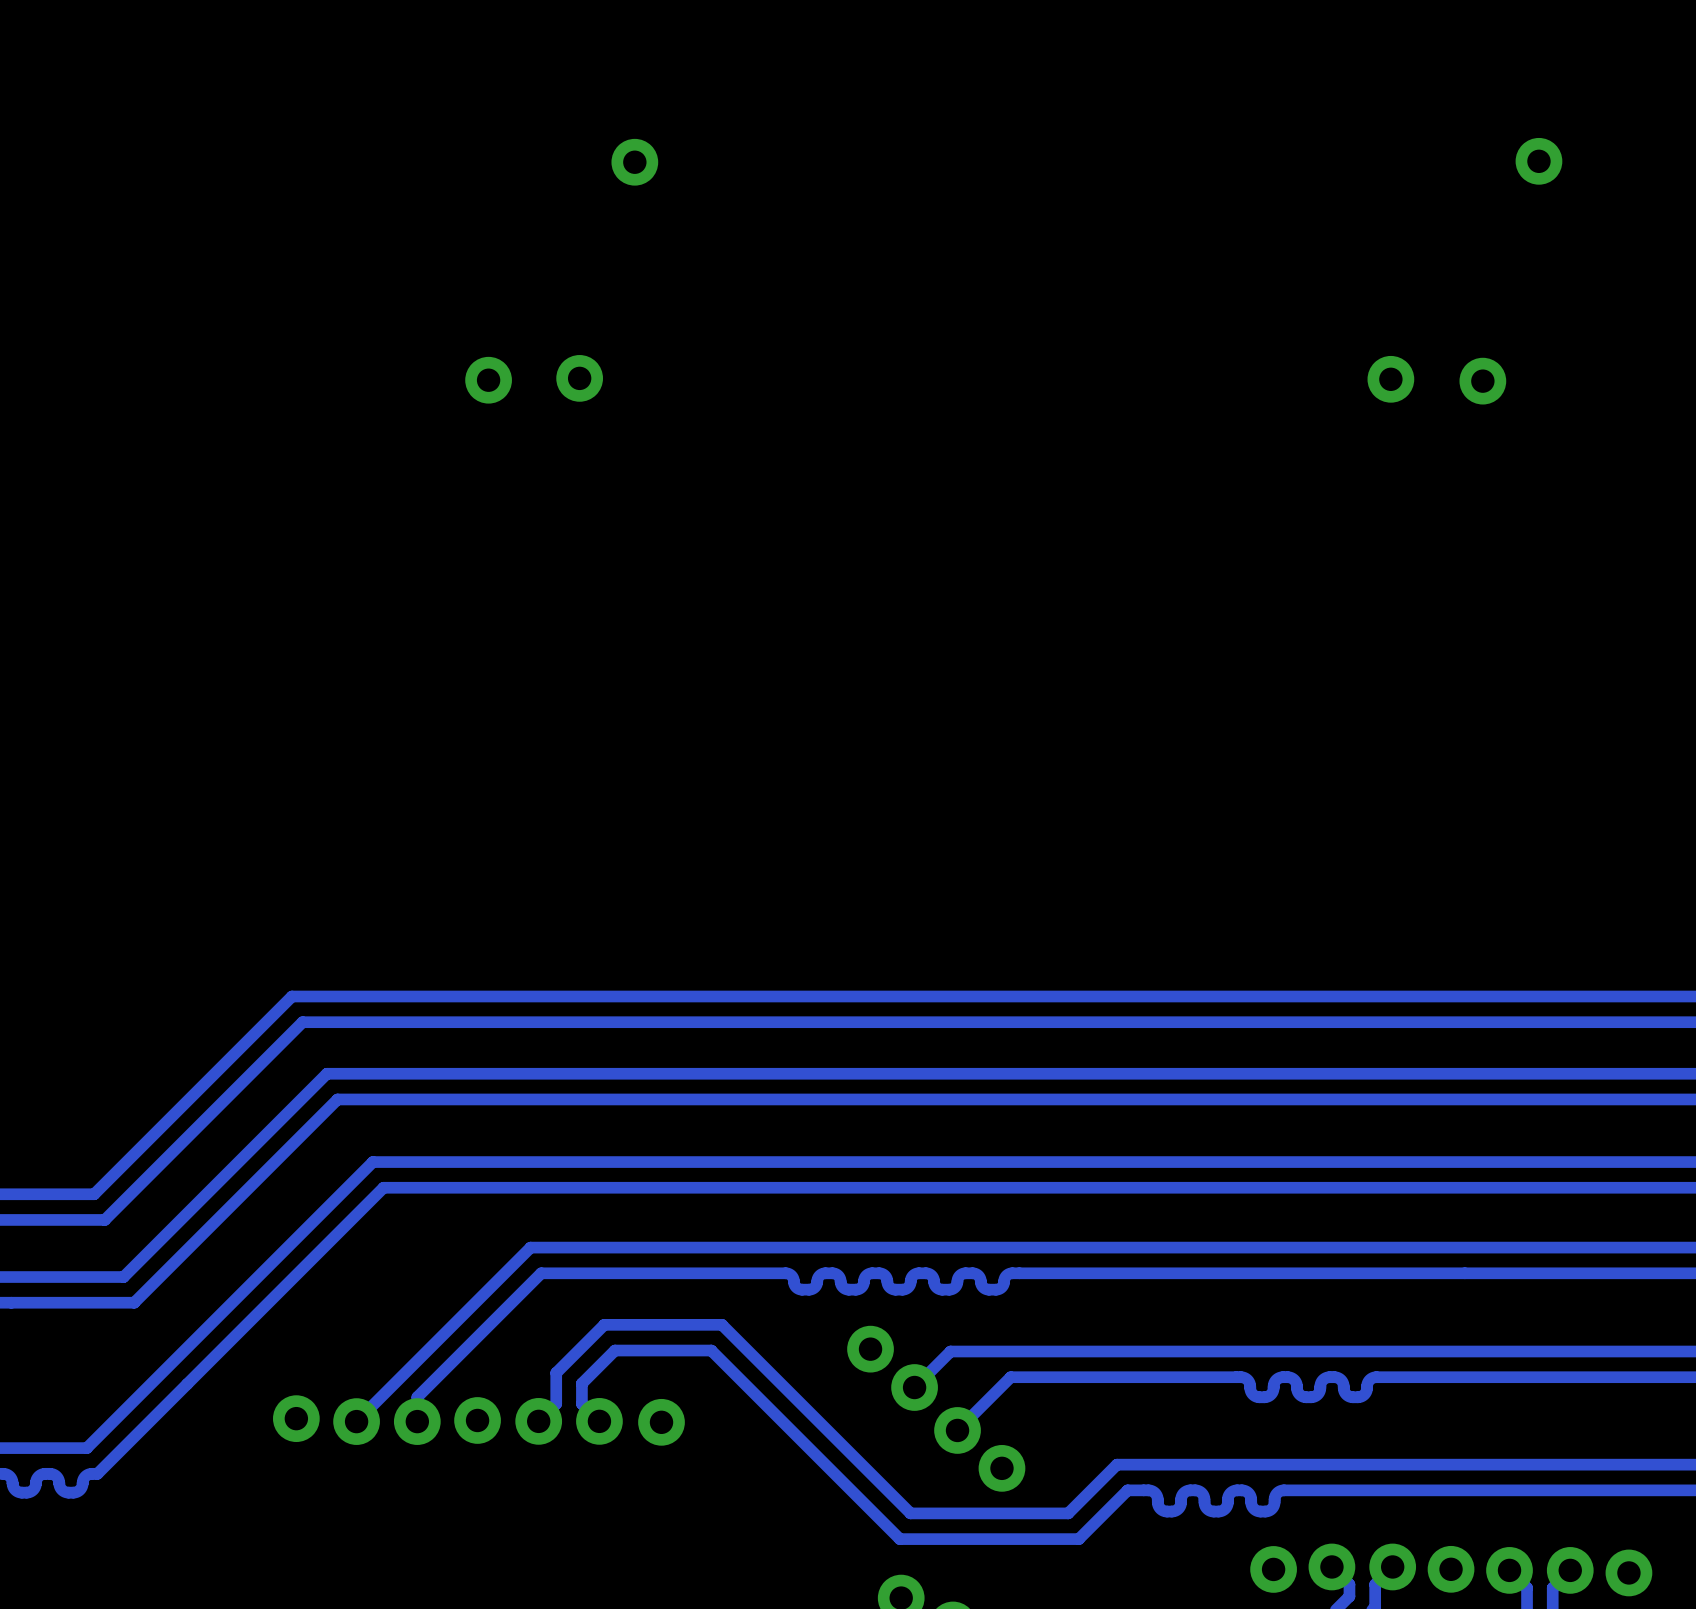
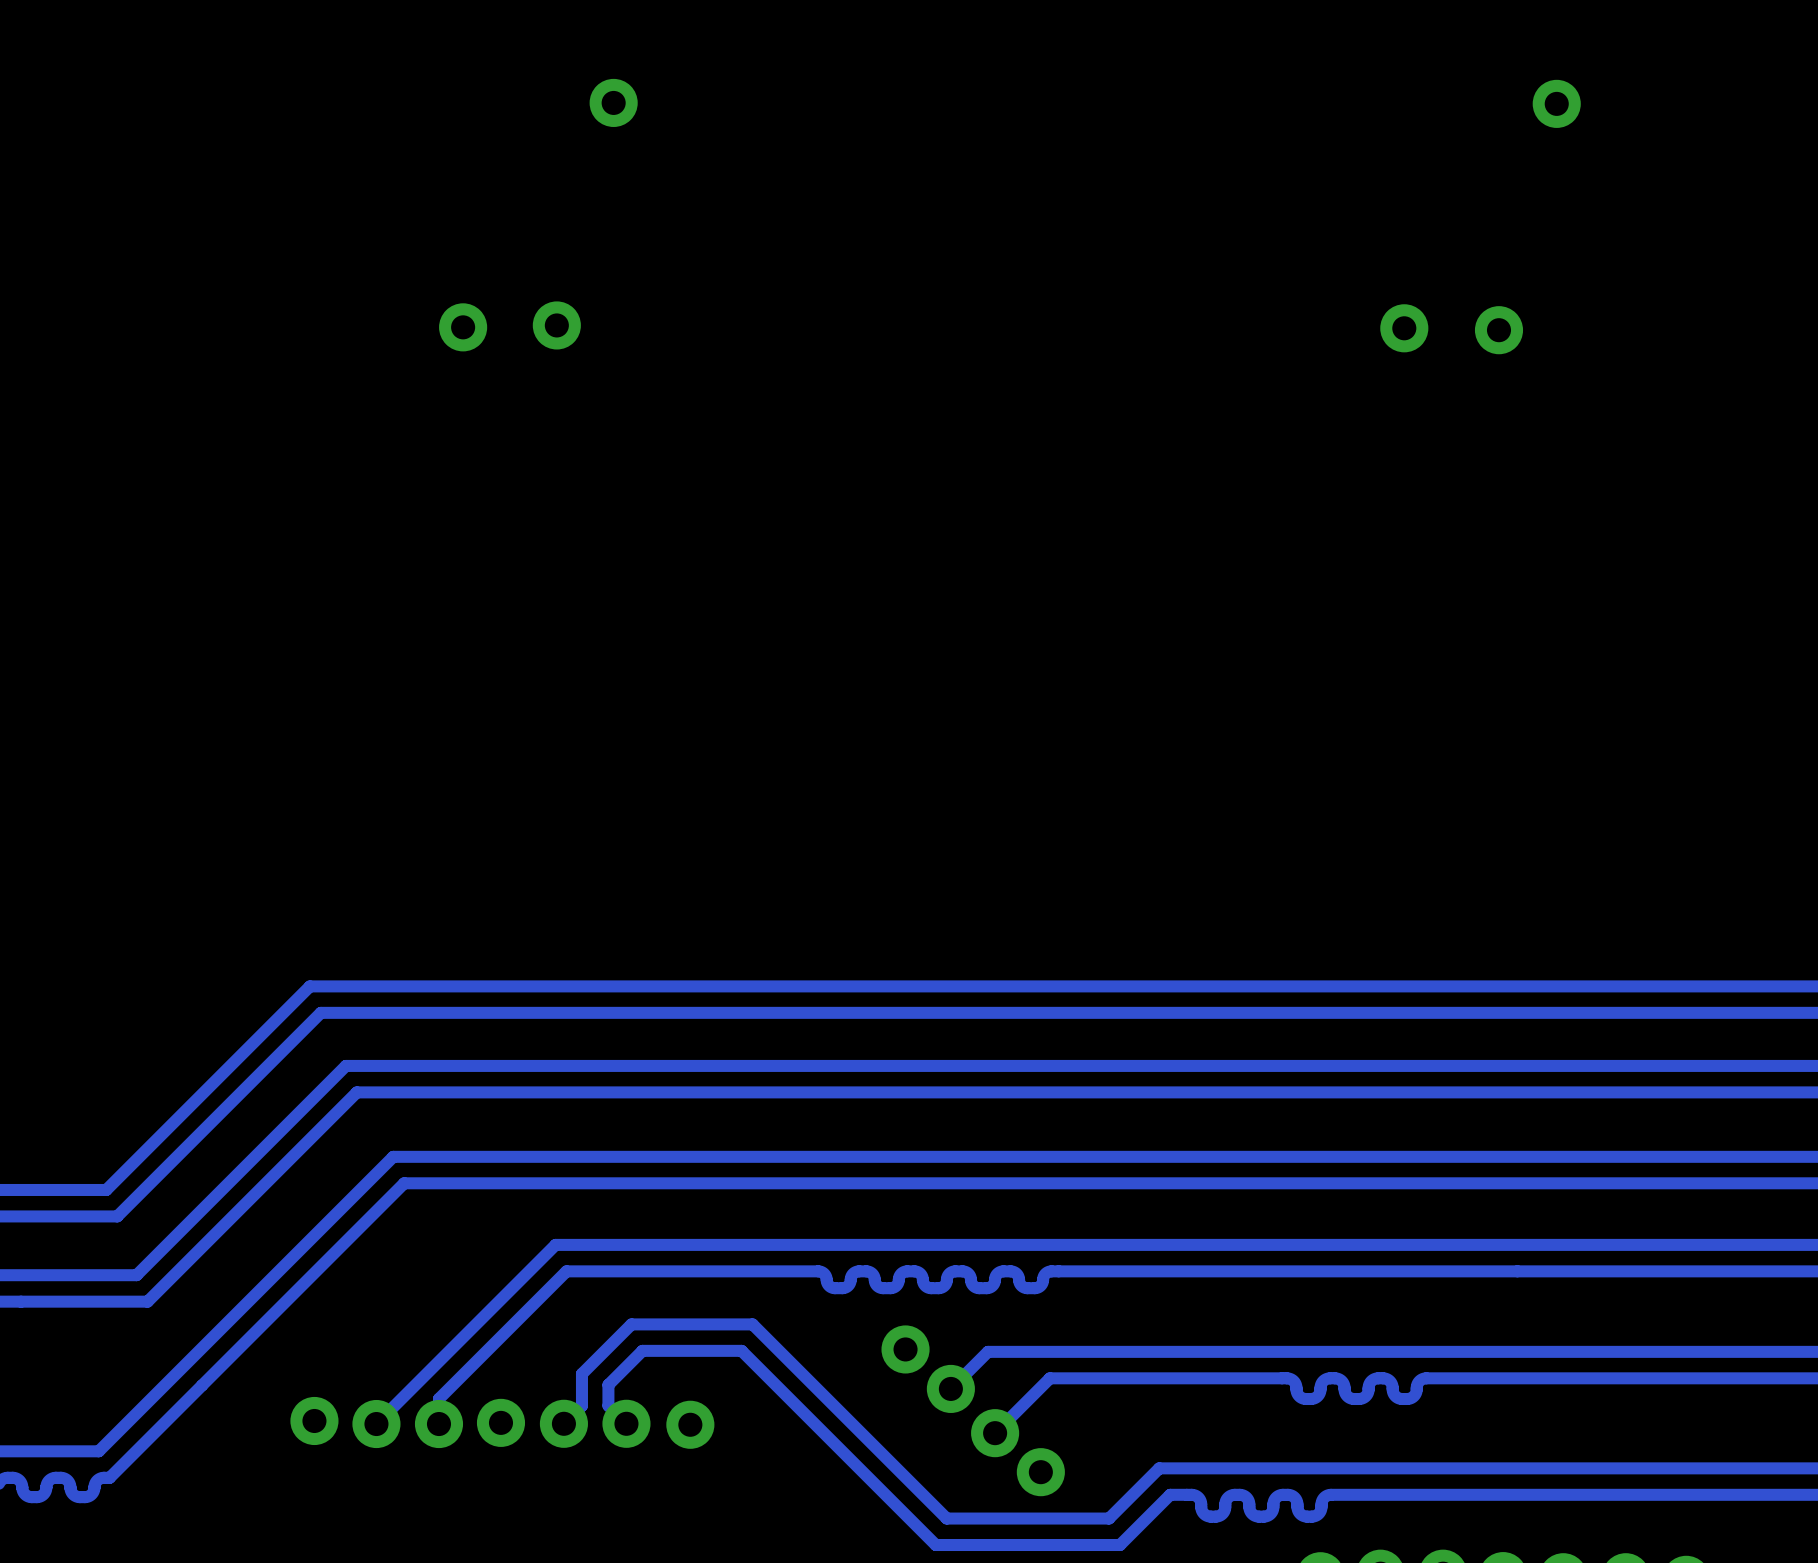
via position: (1538, 161) -> (1556, 103)
via position: (634, 162) -> (613, 102)
via: none -> (463, 327)
via: (579, 378) -> none
via position: (1390, 379) -> (1404, 328)
via position: (488, 380) -> (556, 325)
via position: (1482, 381) -> (1498, 330)

